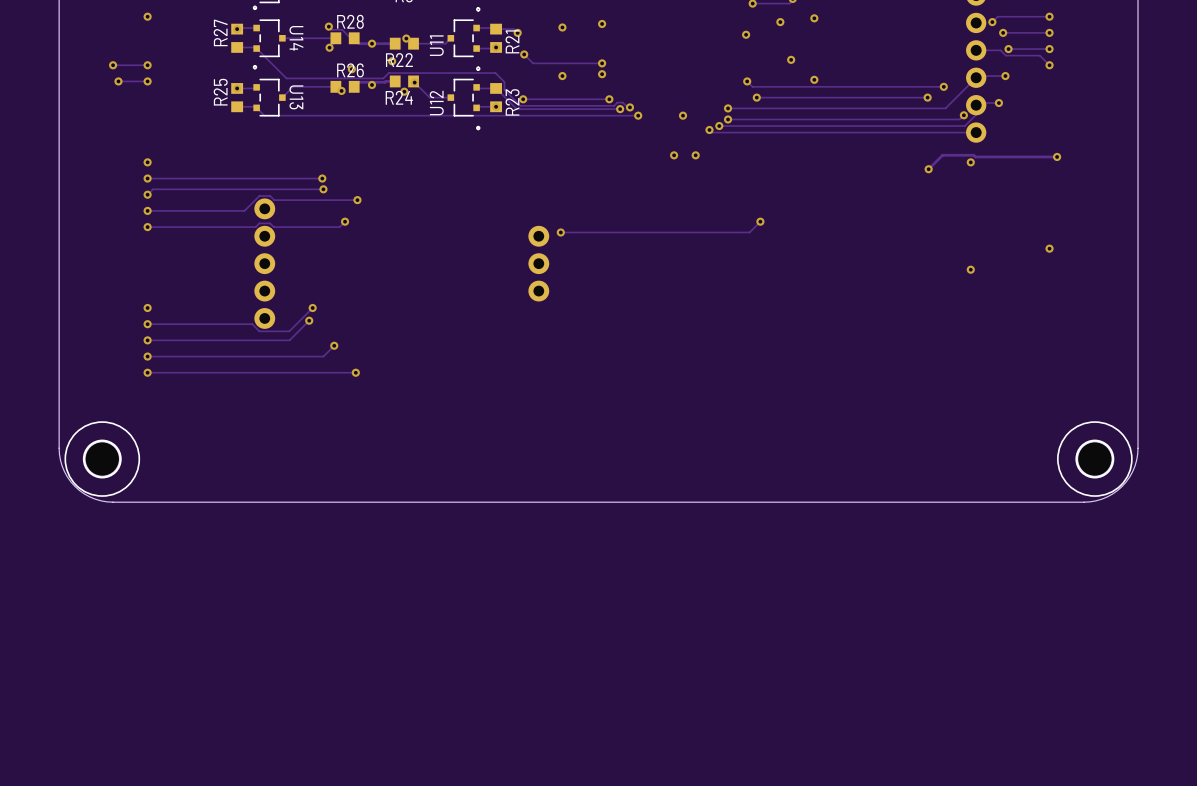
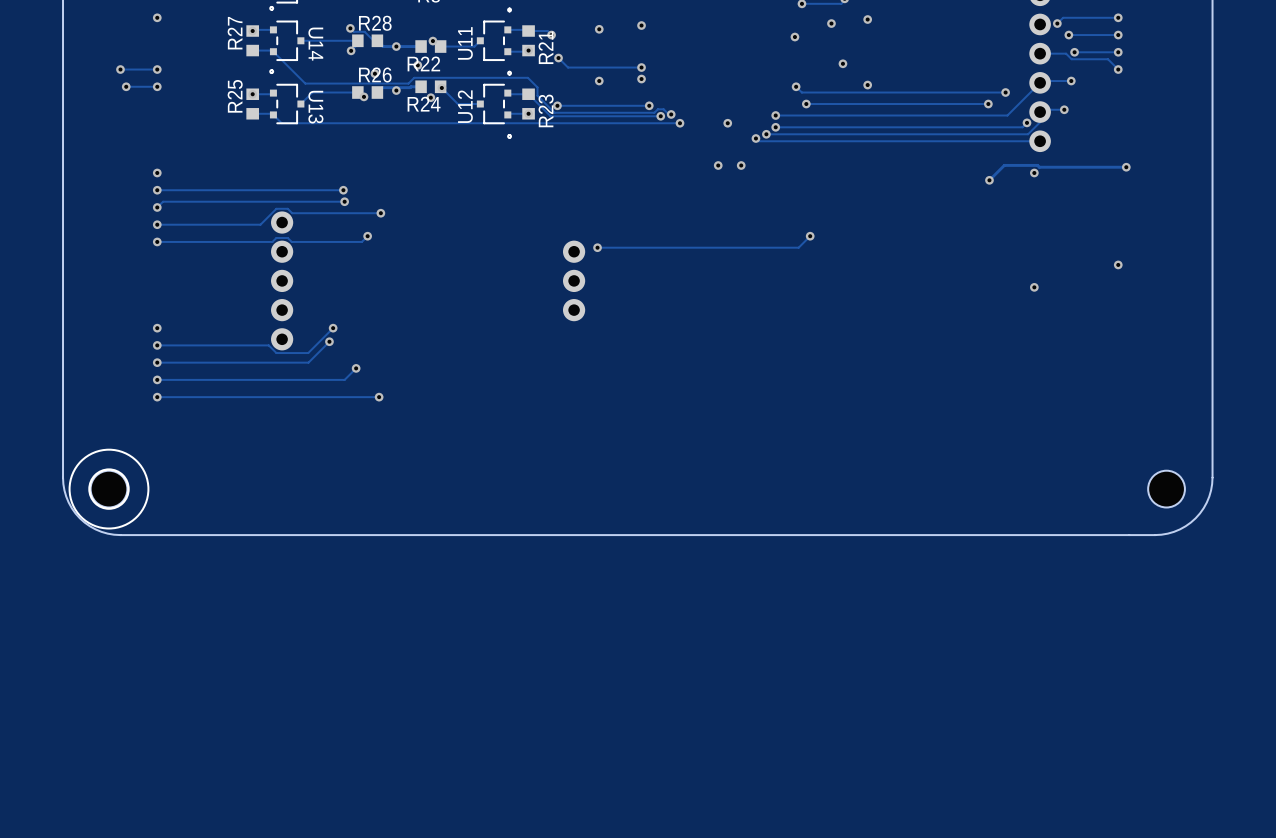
part side: bottom (1094, 459) -> top (1166, 489)

